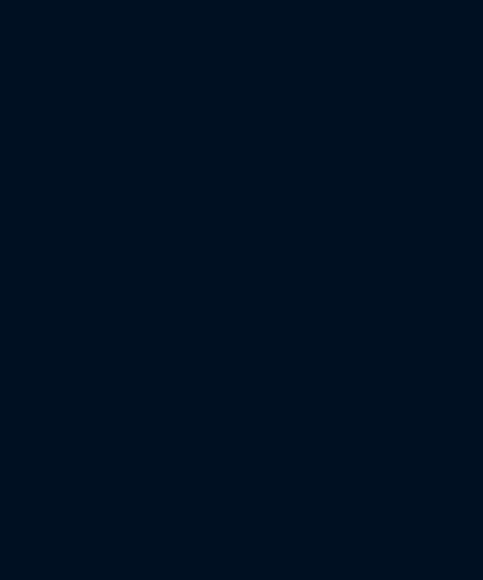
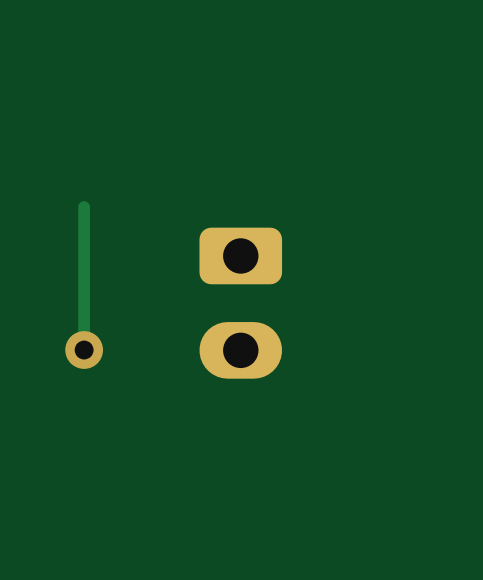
track: none -> (84, 207) (84, 350)
part: none -> (240, 303)
via: none -> (84, 350)

